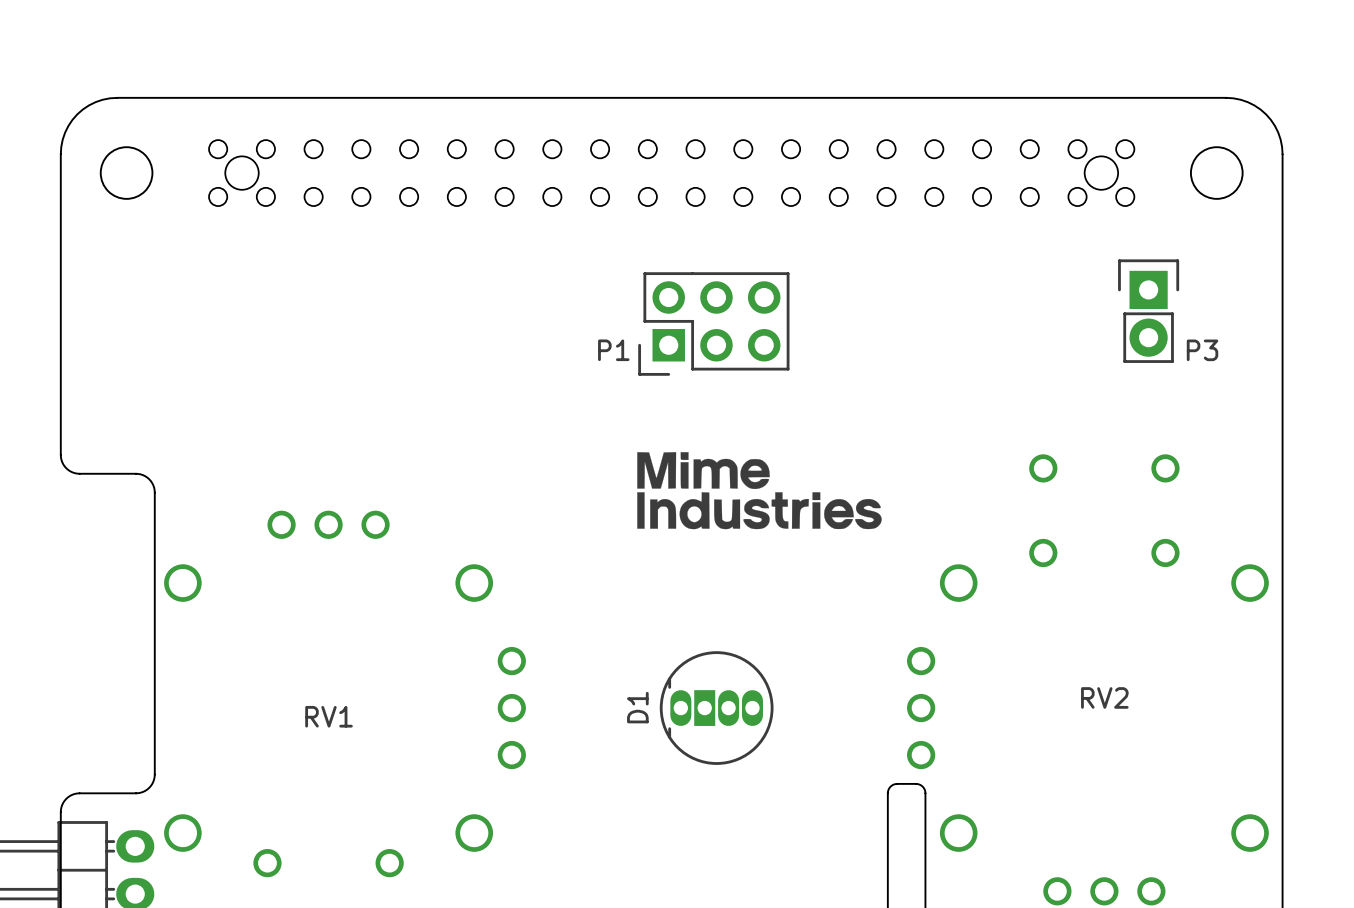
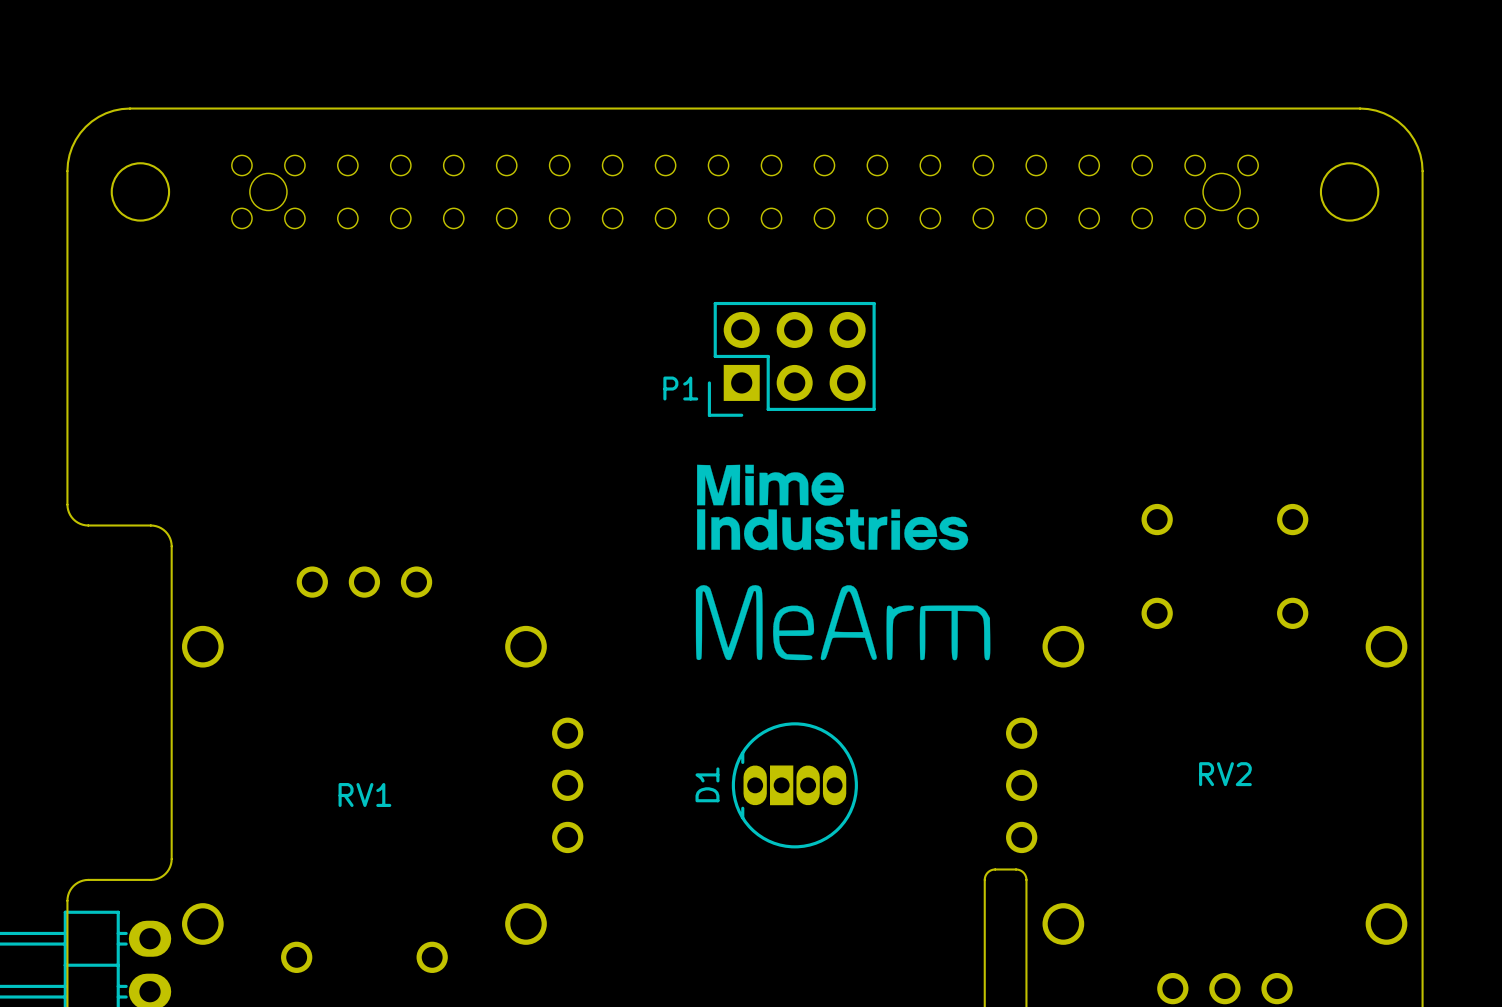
P3: (1148, 311) -> none
drawing position: (759, 490) -> (832, 507)
drawing: none -> [695, 585, 991, 661]

